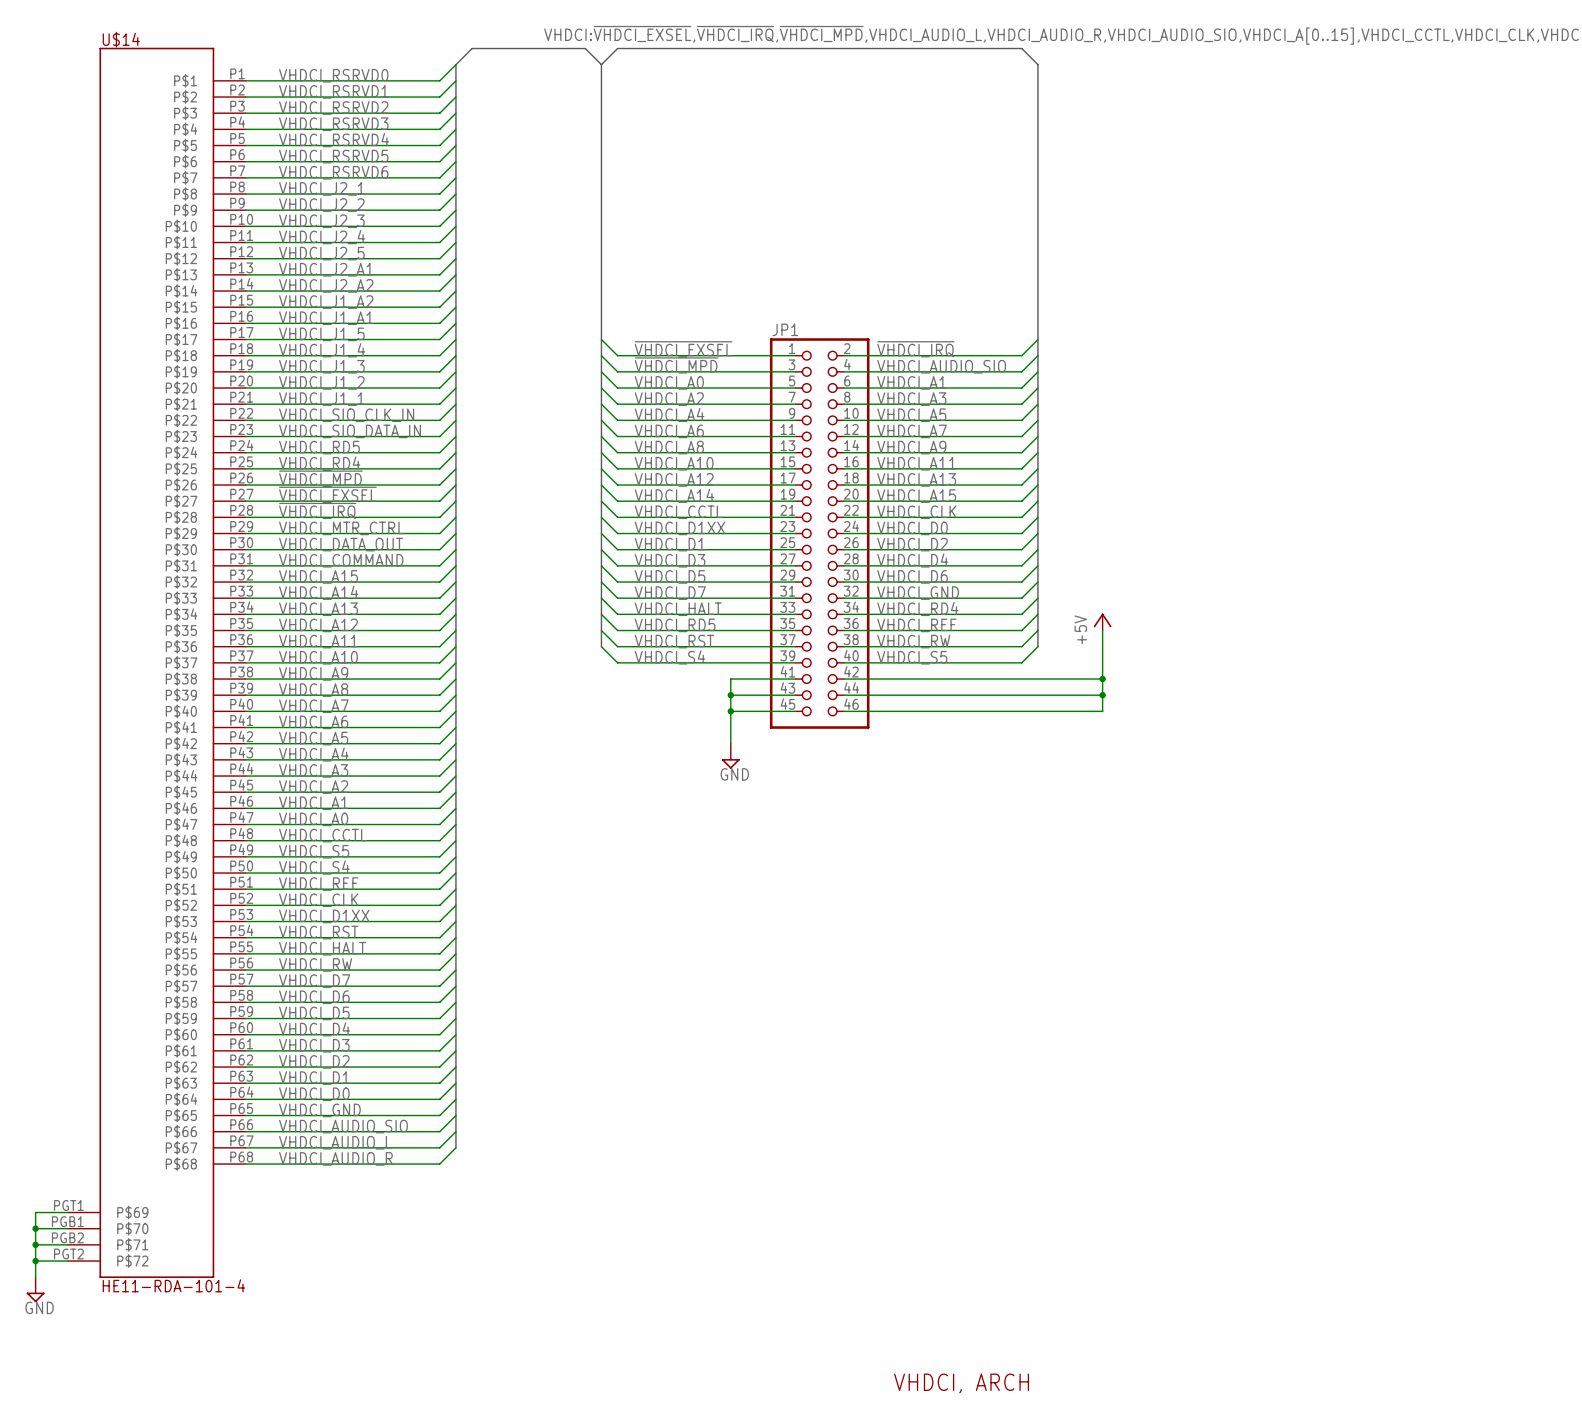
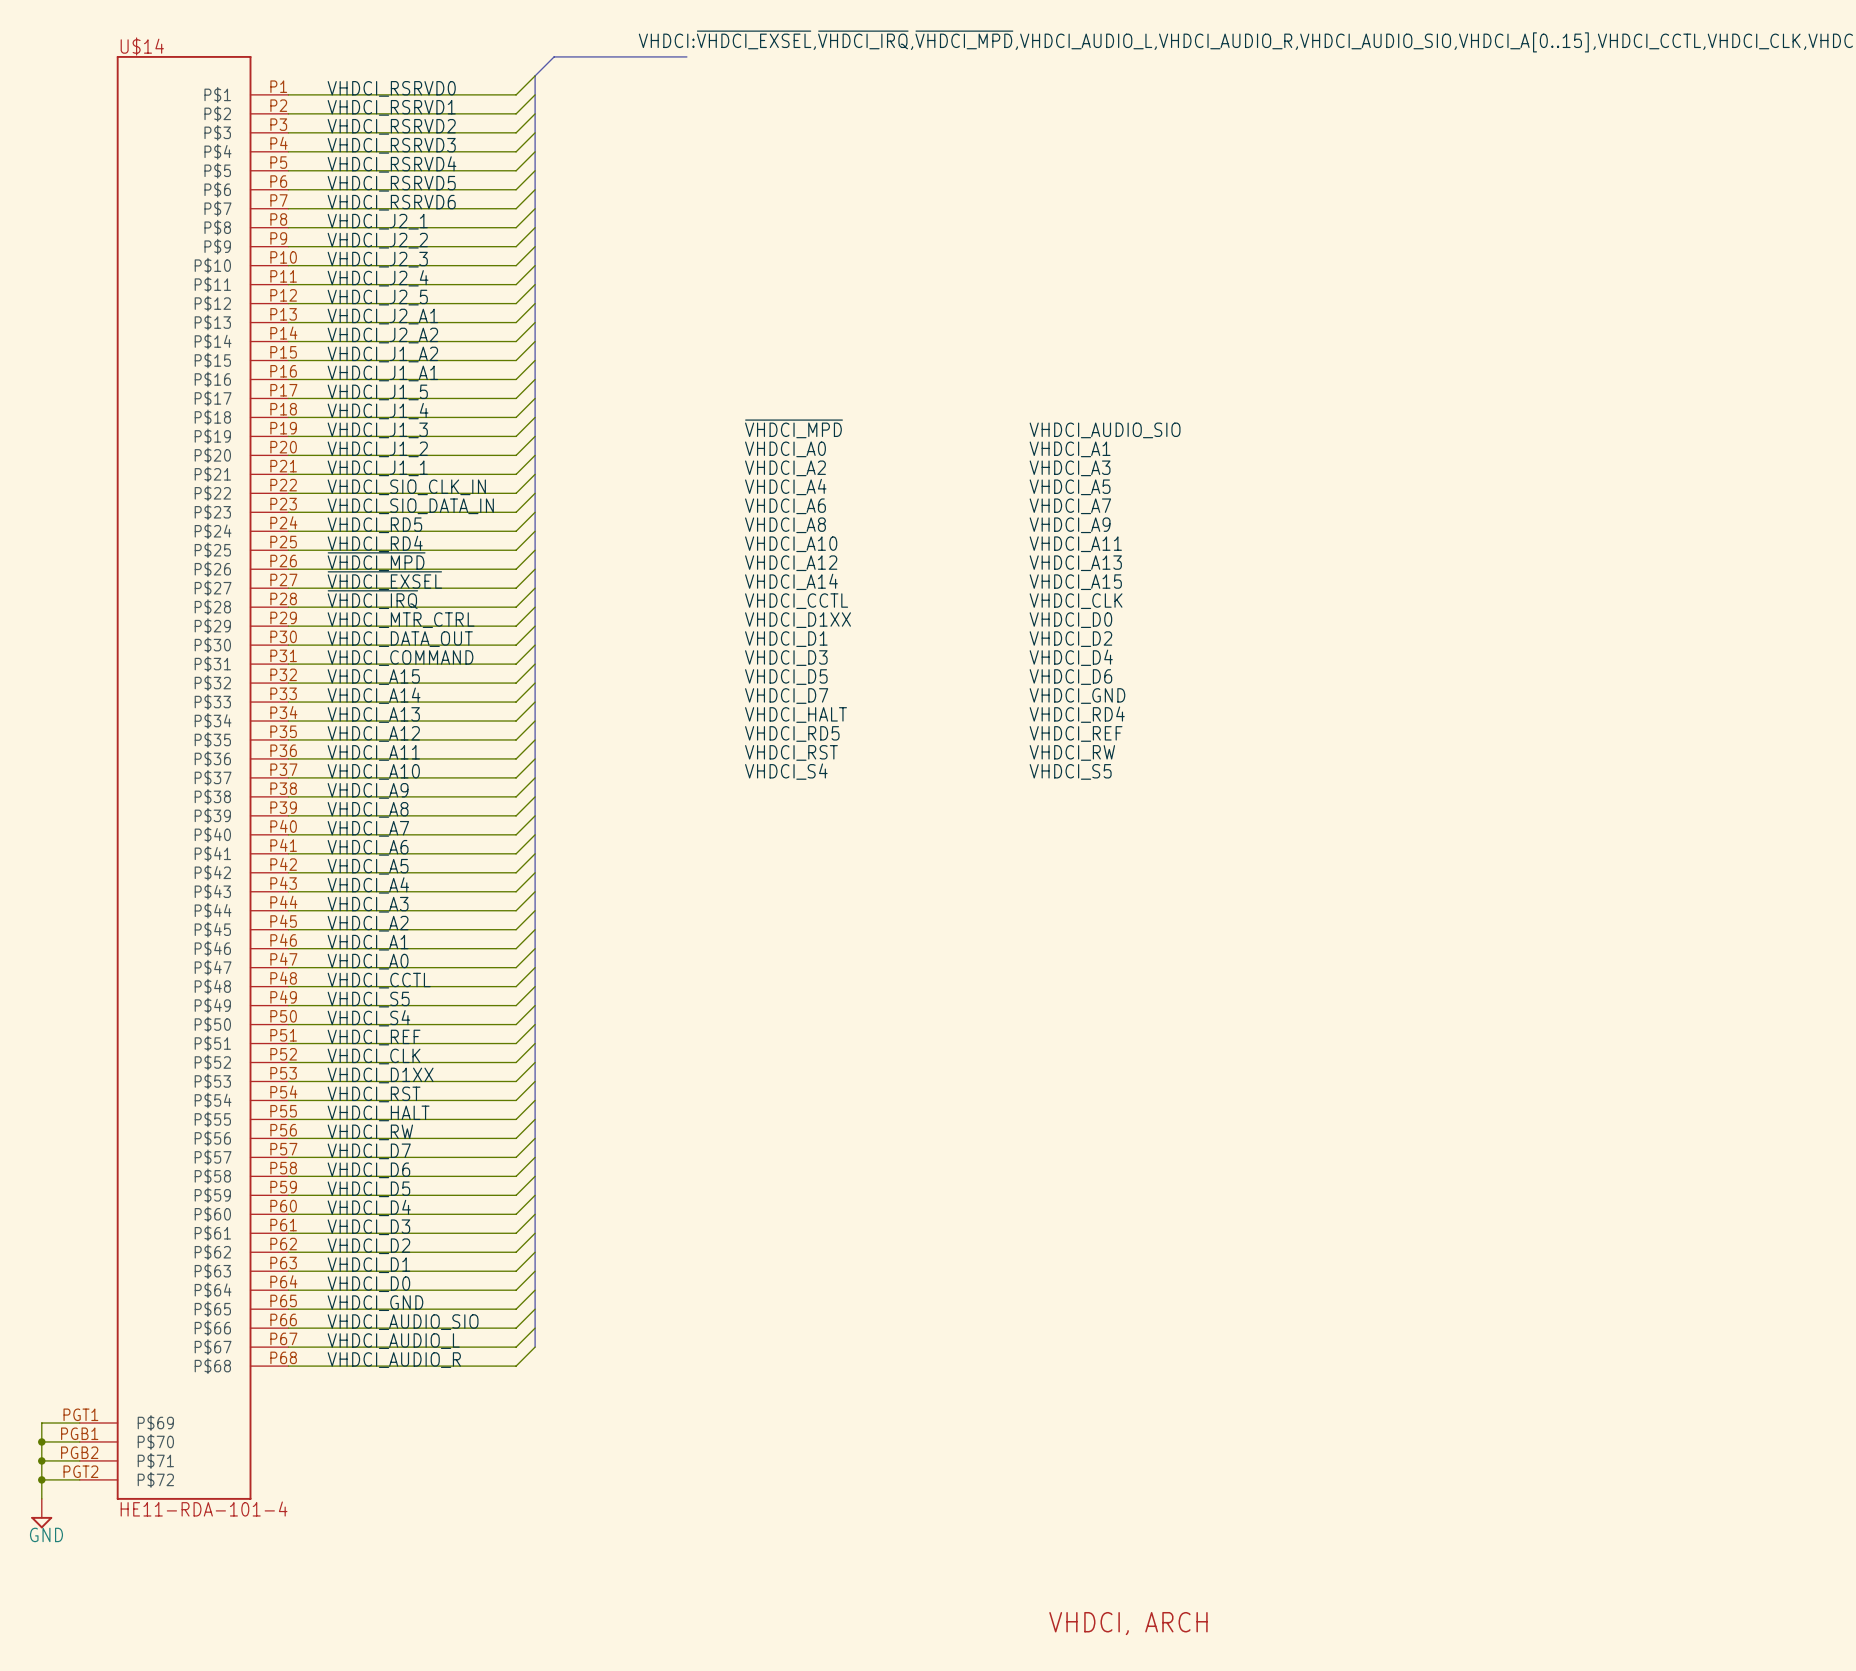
bus: (585, 48) (601, 64) -> none
bus: (601, 64) (601, 646) -> none
bus: (601, 64) (617, 48) (1021, 48) (1037, 64) (1037, 646) -> none
wire: (601, 339) (617, 355) (795, 355) -> none
wire: (1037, 339) (1021, 355) (843, 355) -> none
label: ~{VHDCI_EXSEL} (683, 349) -> none
label: ~{VHDCI_IRQ} (915, 349) -> none
wire: (601, 355) (617, 371) (795, 371) -> none
wire: (1037, 355) (1021, 371) (843, 371) -> none
wire: (601, 371) (617, 388) (795, 388) -> none
wire: (1037, 371) (1021, 388) (843, 388) -> none
wire: (601, 388) (617, 404) (795, 404) -> none
wire: (1037, 388) (1021, 404) (843, 404) -> none
wire: (601, 404) (617, 420) (795, 420) -> none
wire: (1037, 404) (1021, 420) (843, 420) -> none
wire: (601, 420) (617, 436) (795, 436) -> none
wire: (1037, 420) (1021, 436) (843, 436) -> none
wire: (601, 436) (617, 452) (795, 452) -> none
wire: (1037, 436) (1021, 452) (843, 452) -> none
wire: (601, 452) (617, 468) (795, 468) -> none
wire: (1037, 452) (1021, 468) (843, 468) -> none
wire: (601, 468) (617, 485) (795, 485) -> none
wire: (1037, 468) (1021, 485) (843, 485) -> none
wire: (601, 485) (617, 501) (795, 501) -> none
wire: (1037, 485) (1021, 501) (843, 501) -> none
wire: (601, 501) (617, 517) (795, 517) -> none
wire: (1037, 501) (1021, 517) (843, 517) -> none
wire: (601, 517) (617, 533) (795, 533) -> none
wire: (1037, 517) (1021, 533) (843, 533) -> none
wire: (601, 533) (617, 549) (795, 549) -> none
JP1: (819, 533) -> none
wire: (1037, 533) (1021, 549) (843, 549) -> none
wire: (601, 549) (617, 565) (795, 565) -> none
wire: (1037, 549) (1021, 565) (843, 565) -> none
wire: (601, 565) (617, 582) (795, 582) -> none
wire: (1037, 565) (1021, 582) (843, 582) -> none
wire: (601, 582) (617, 598) (795, 598) -> none
wire: (1037, 582) (1021, 598) (843, 598) -> none
wire: (601, 598) (617, 614) (795, 614) -> none
wire: (1037, 598) (1021, 614) (843, 614) -> none
wire: (601, 614) (617, 630) (795, 630) -> none
wire: (1037, 614) (1021, 630) (843, 630) -> none
power symbol: +5V (1102, 622) -> none
wire: (601, 630) (617, 646) (795, 646) -> none
wire: (1037, 630) (1021, 646) (843, 646) -> none
wire: (1102, 630) (1102, 711) (843, 711) -> none
wire: (601, 646) (617, 662) (795, 662) -> none
wire: (1037, 646) (1021, 662) (843, 662) -> none
wire: (795, 679) (730, 679) (730, 743) -> none
wire: (843, 679) (1102, 679) -> none
junction: (1102, 679) -> none
wire: (730, 695) (795, 695) -> none
junction: (730, 695) -> none
wire: (843, 695) (1102, 695) -> none
junction: (1102, 695) -> none
wire: (730, 711) (795, 711) -> none
junction: (730, 711) -> none
power symbol: GND (730, 756) -> none

